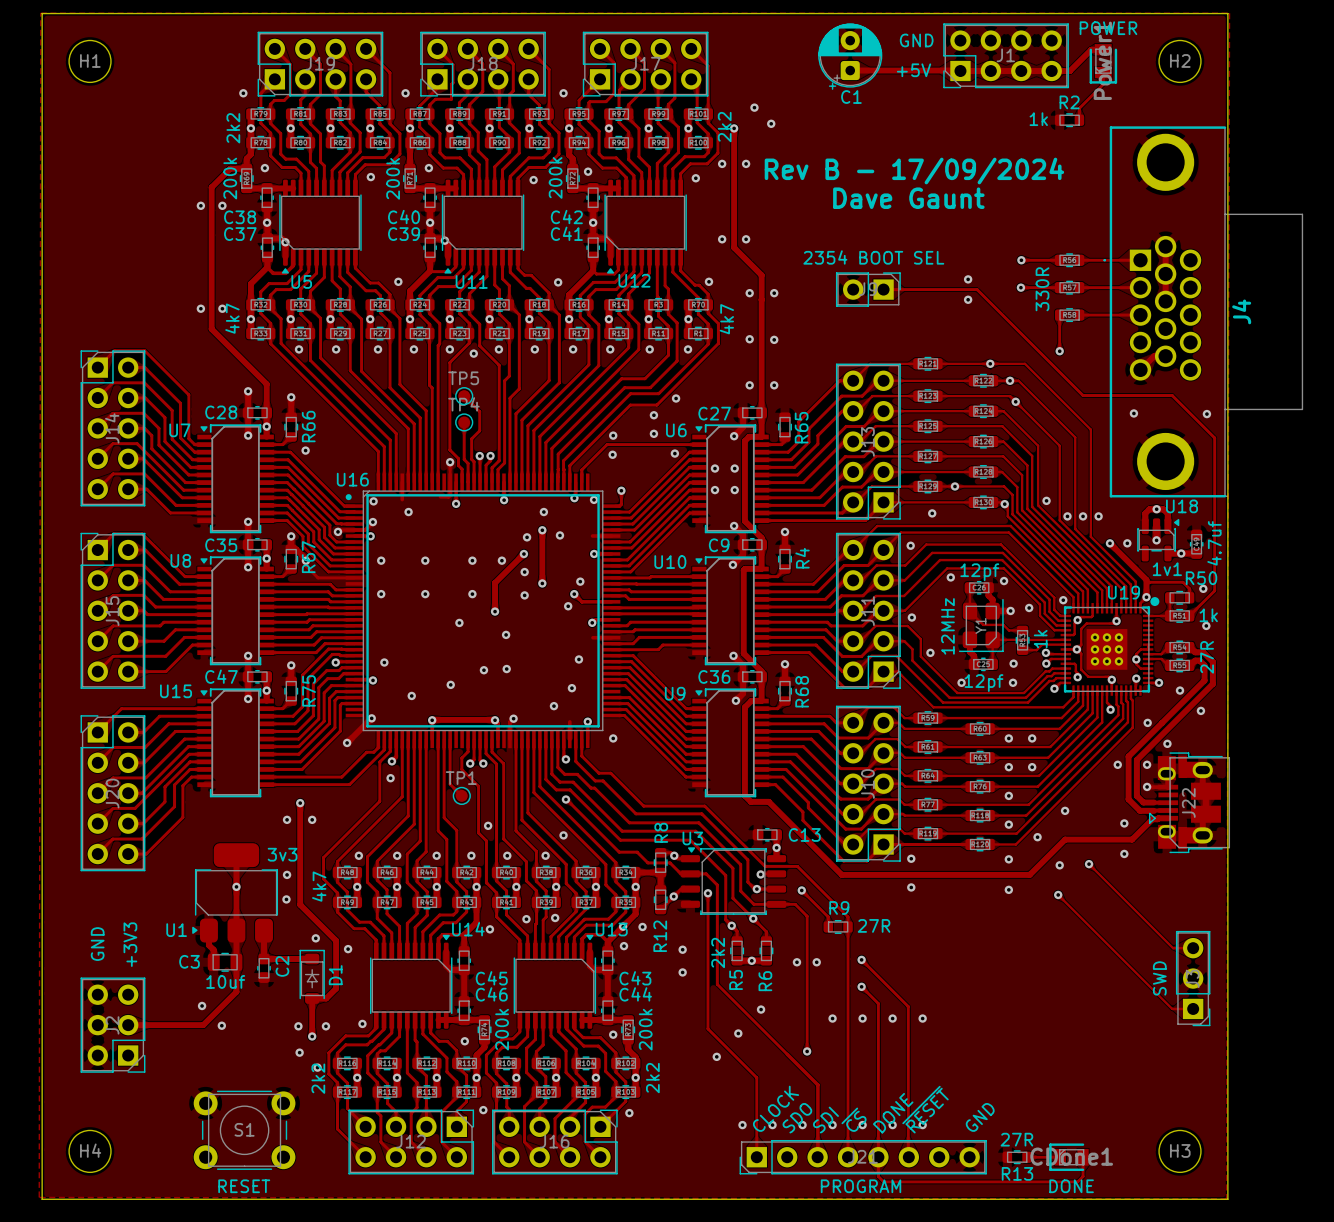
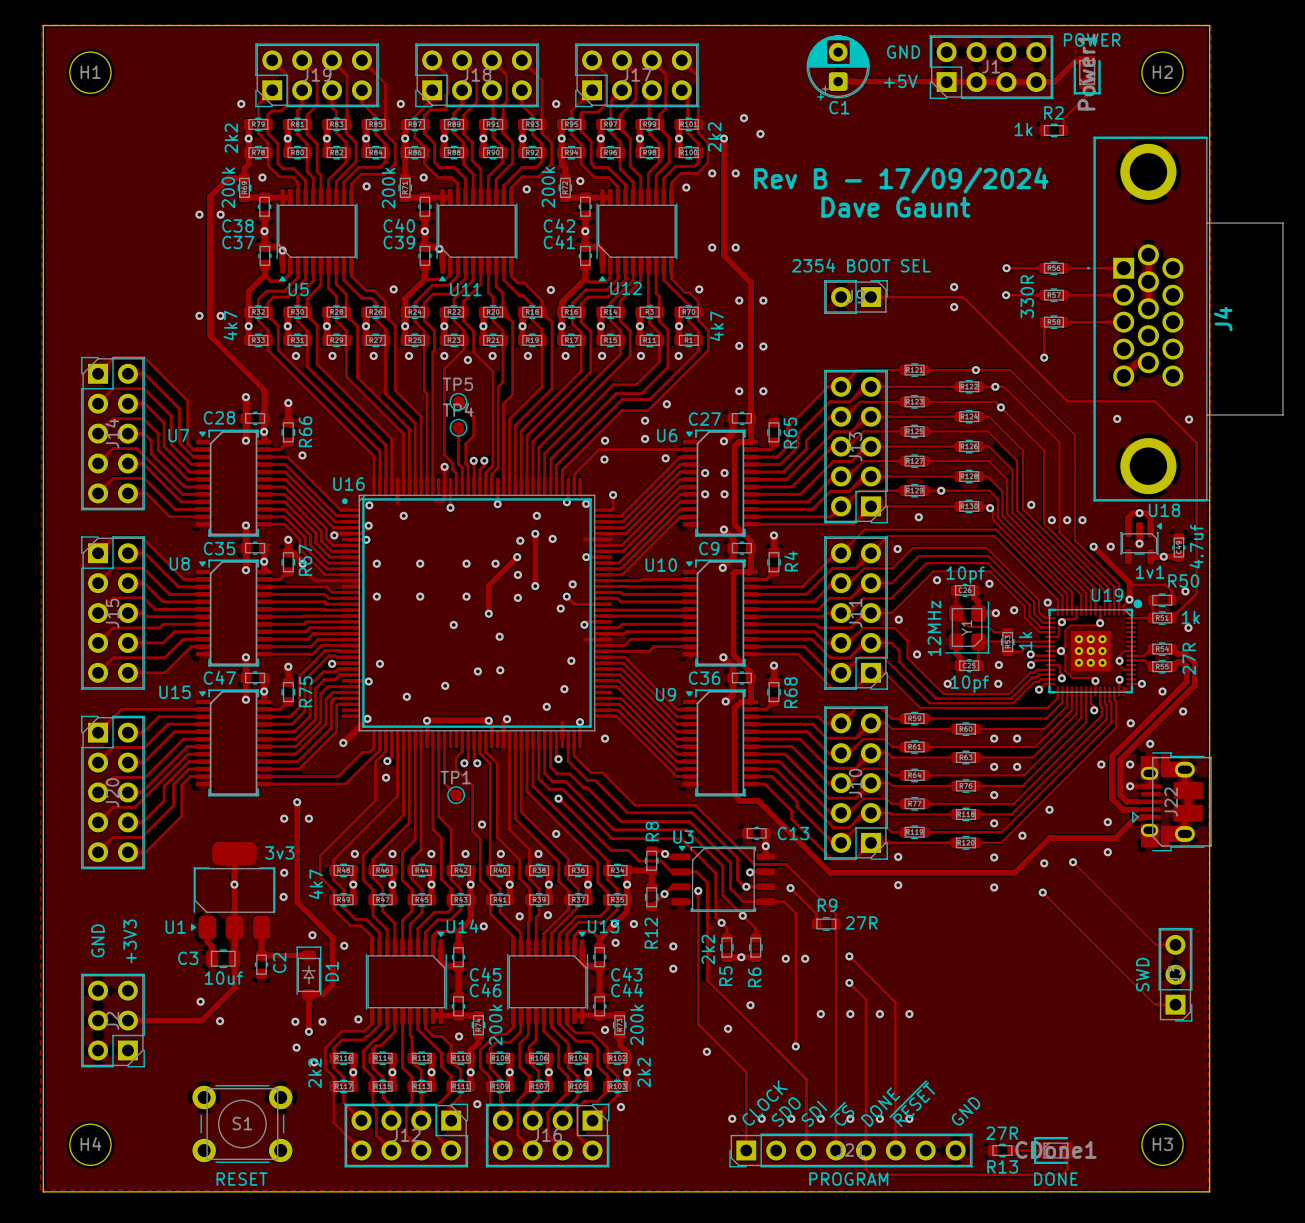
part value: 12pf (979, 572) -> 10pf (965, 575)
part value: 12pf (983, 683) -> 10pf (969, 684)

